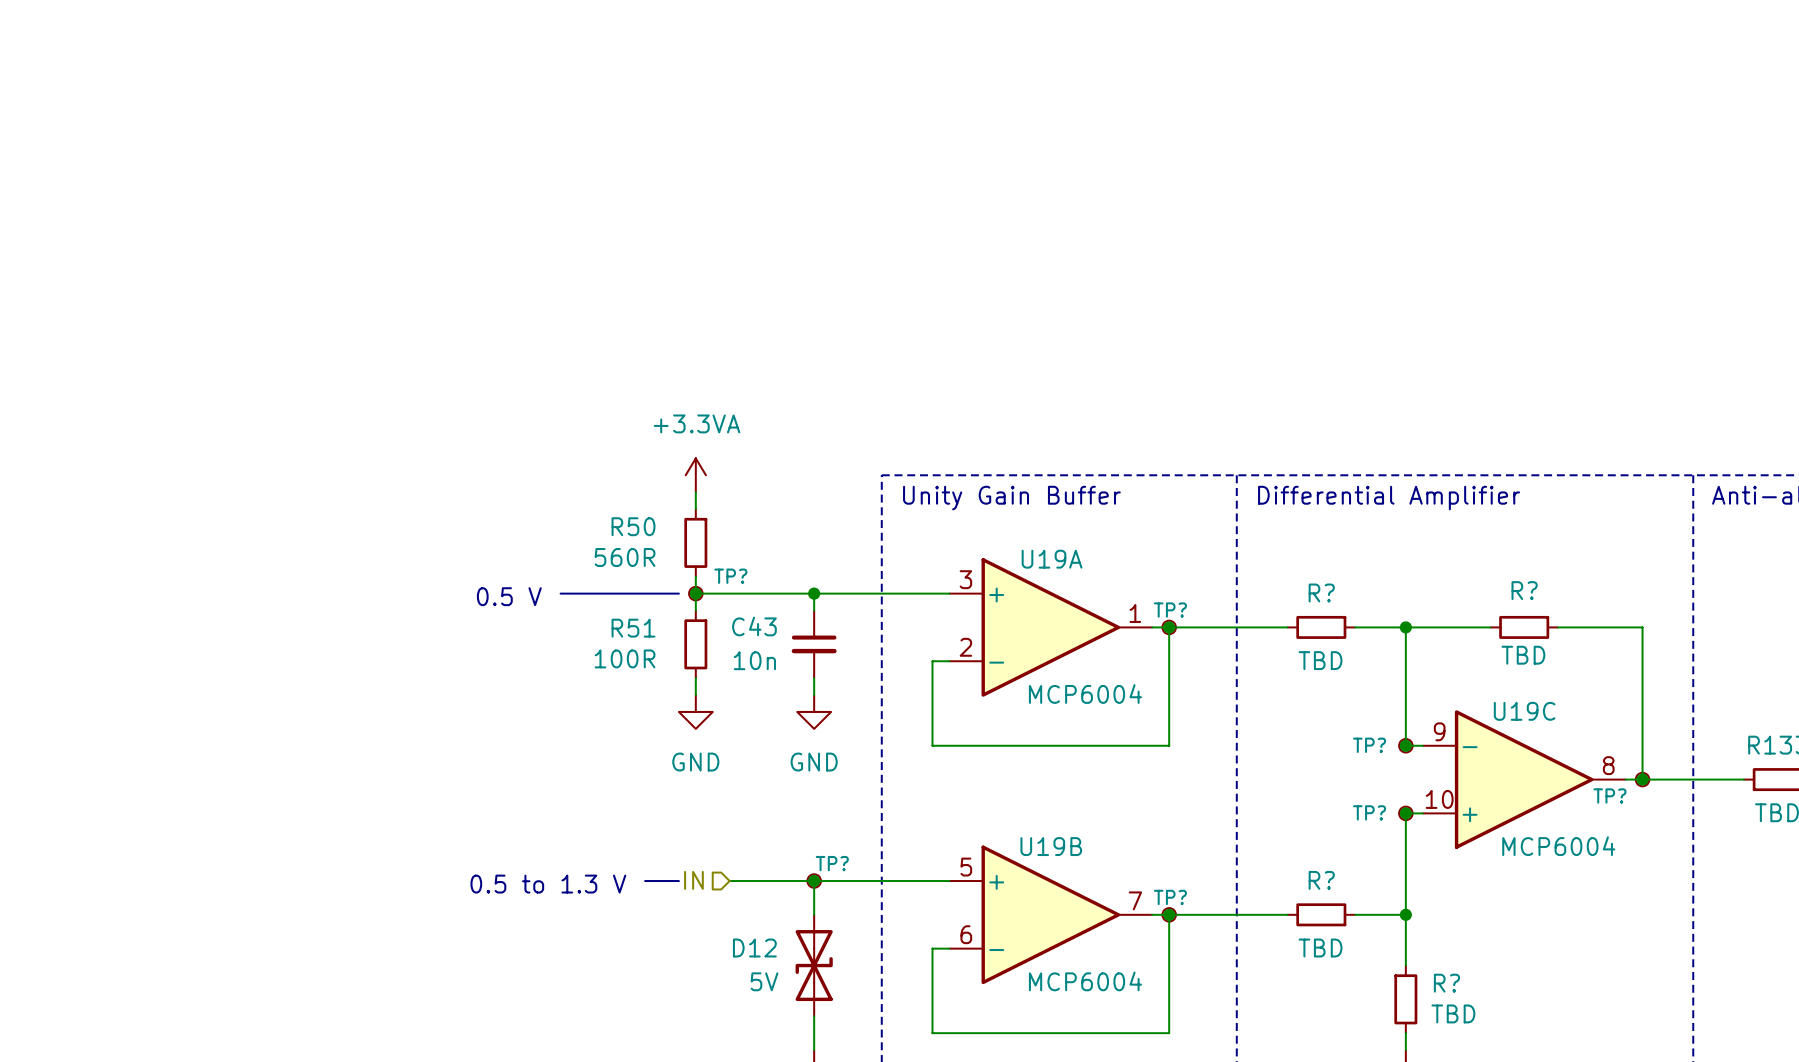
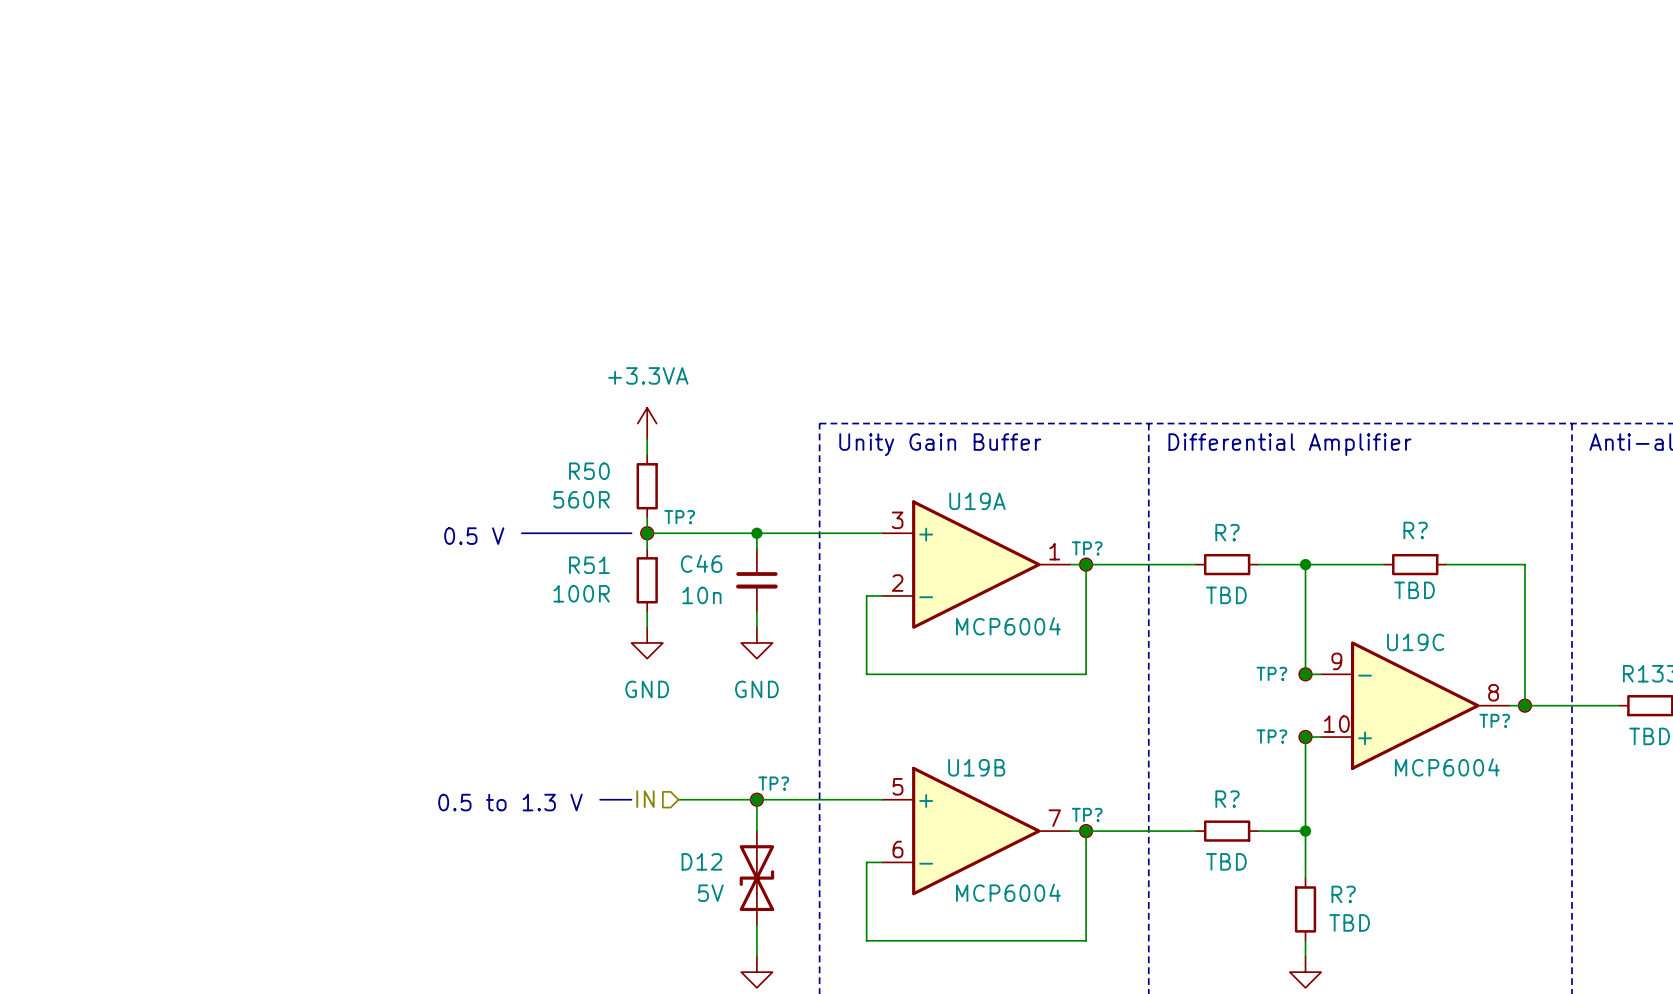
C43 name: C43 (754, 626) -> C46 (701, 563)

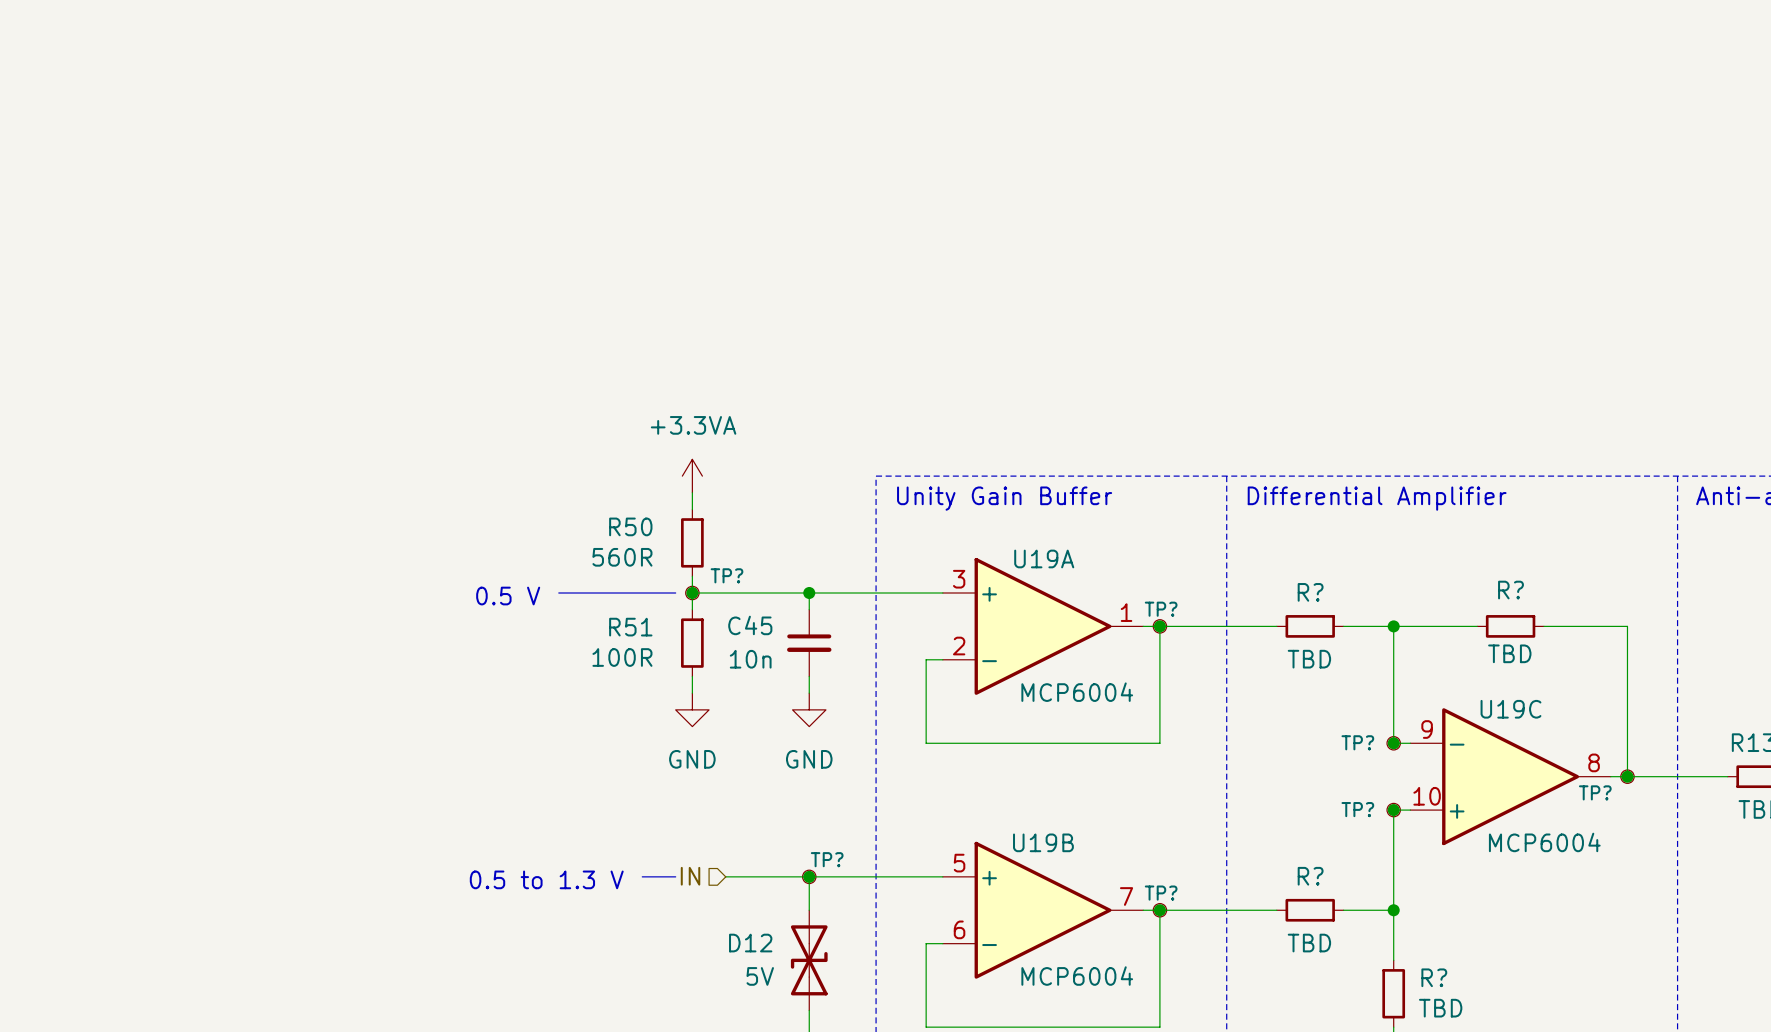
C46 name: C46 (701, 563) -> C45 (750, 625)

